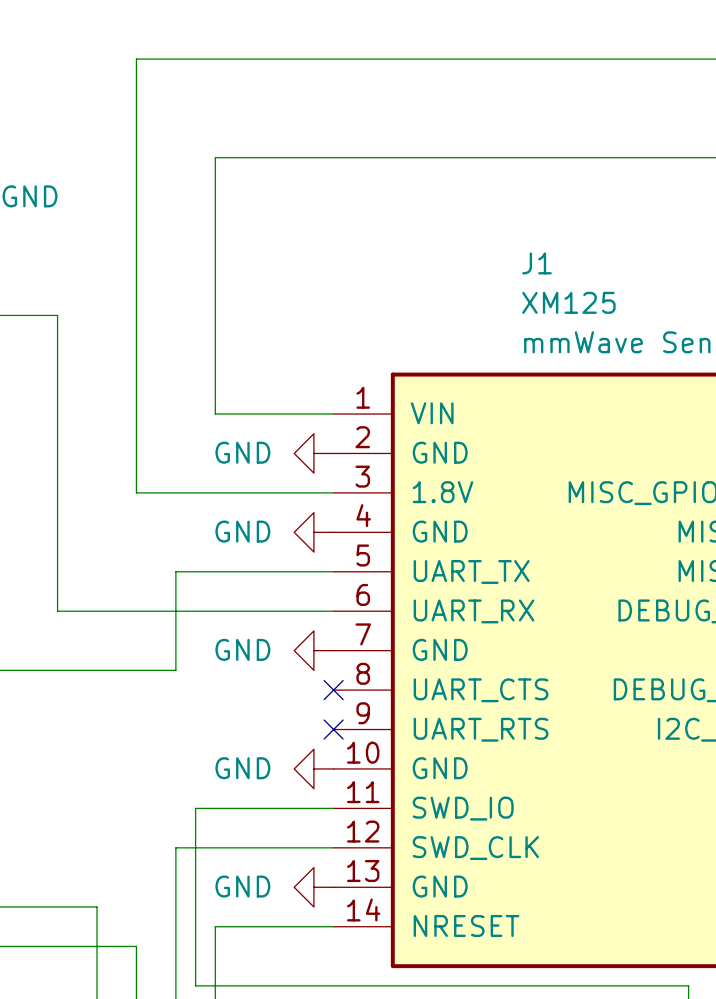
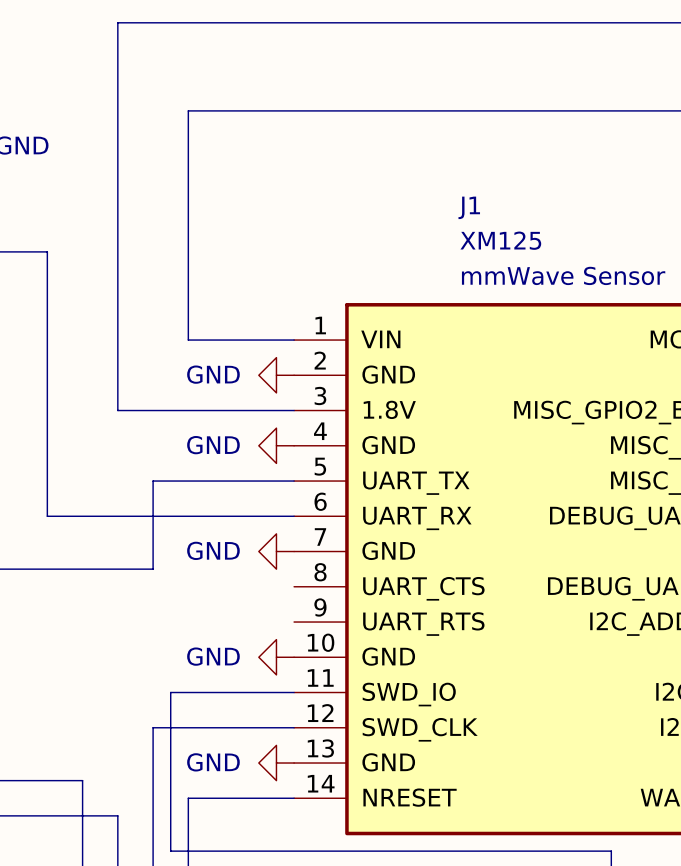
no-connect mark: (333, 690) -> none
no-connect mark: (333, 729) -> none

